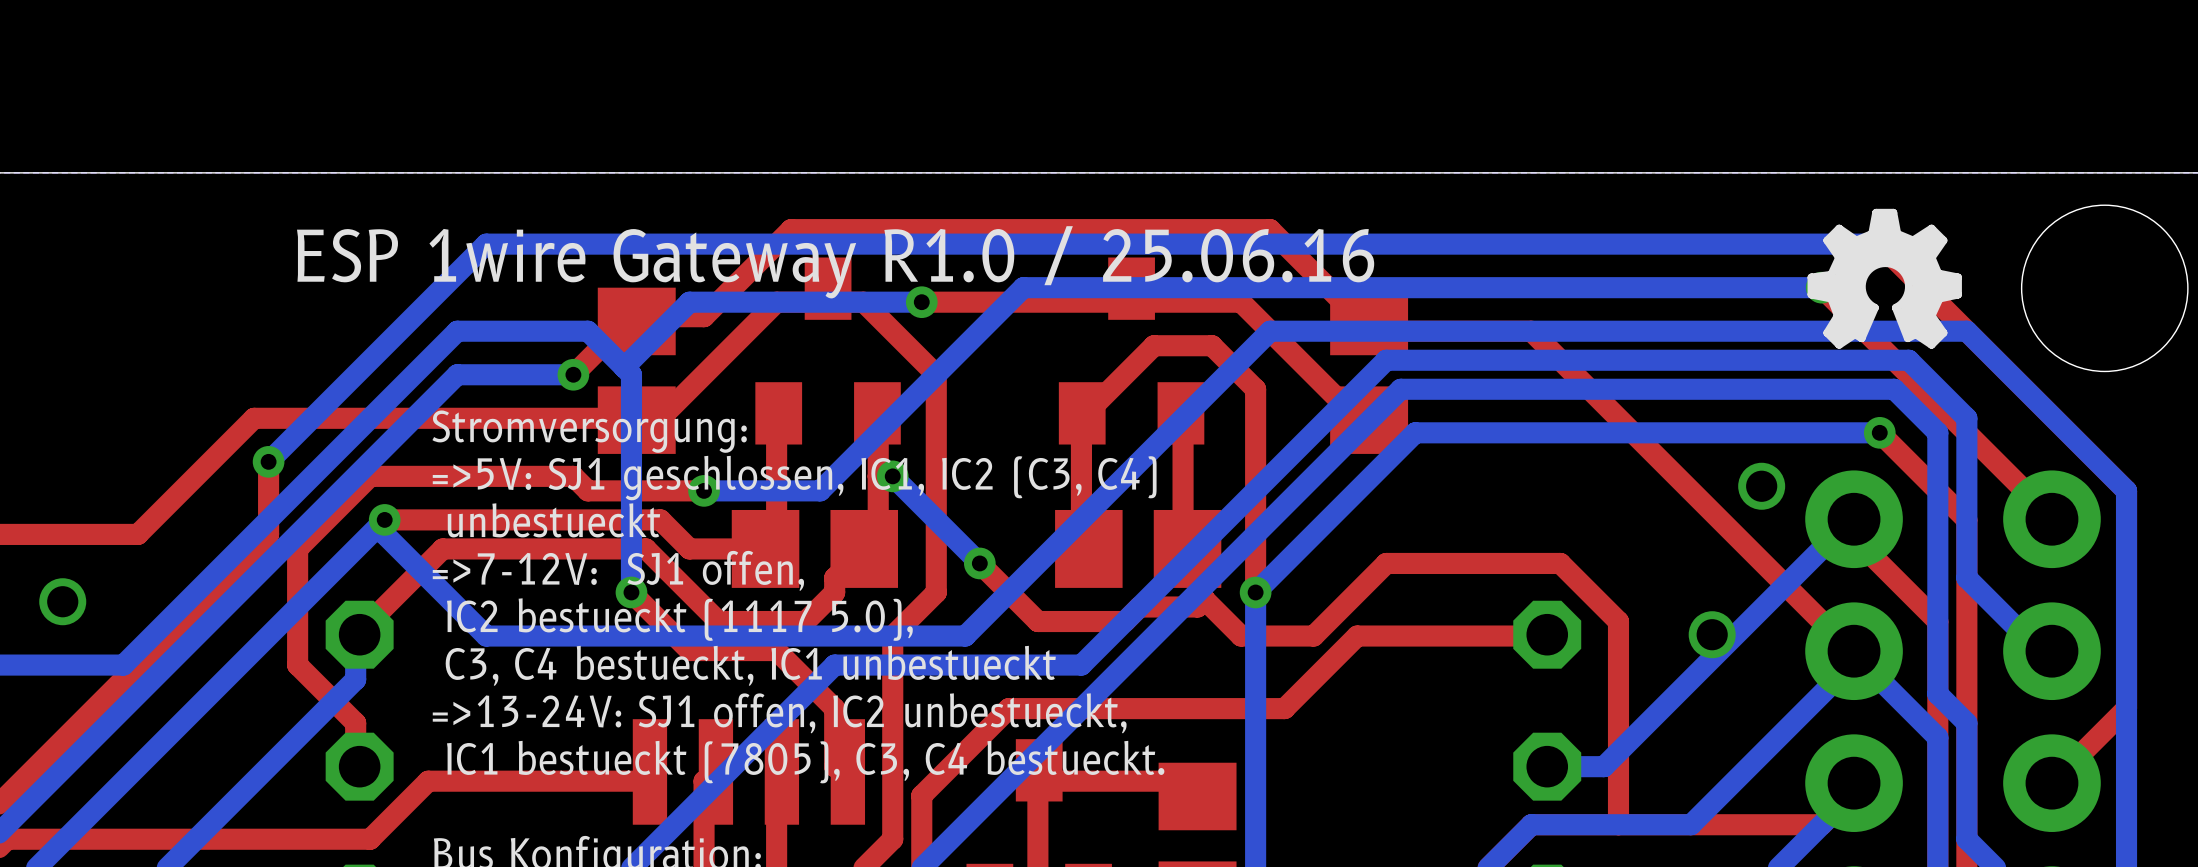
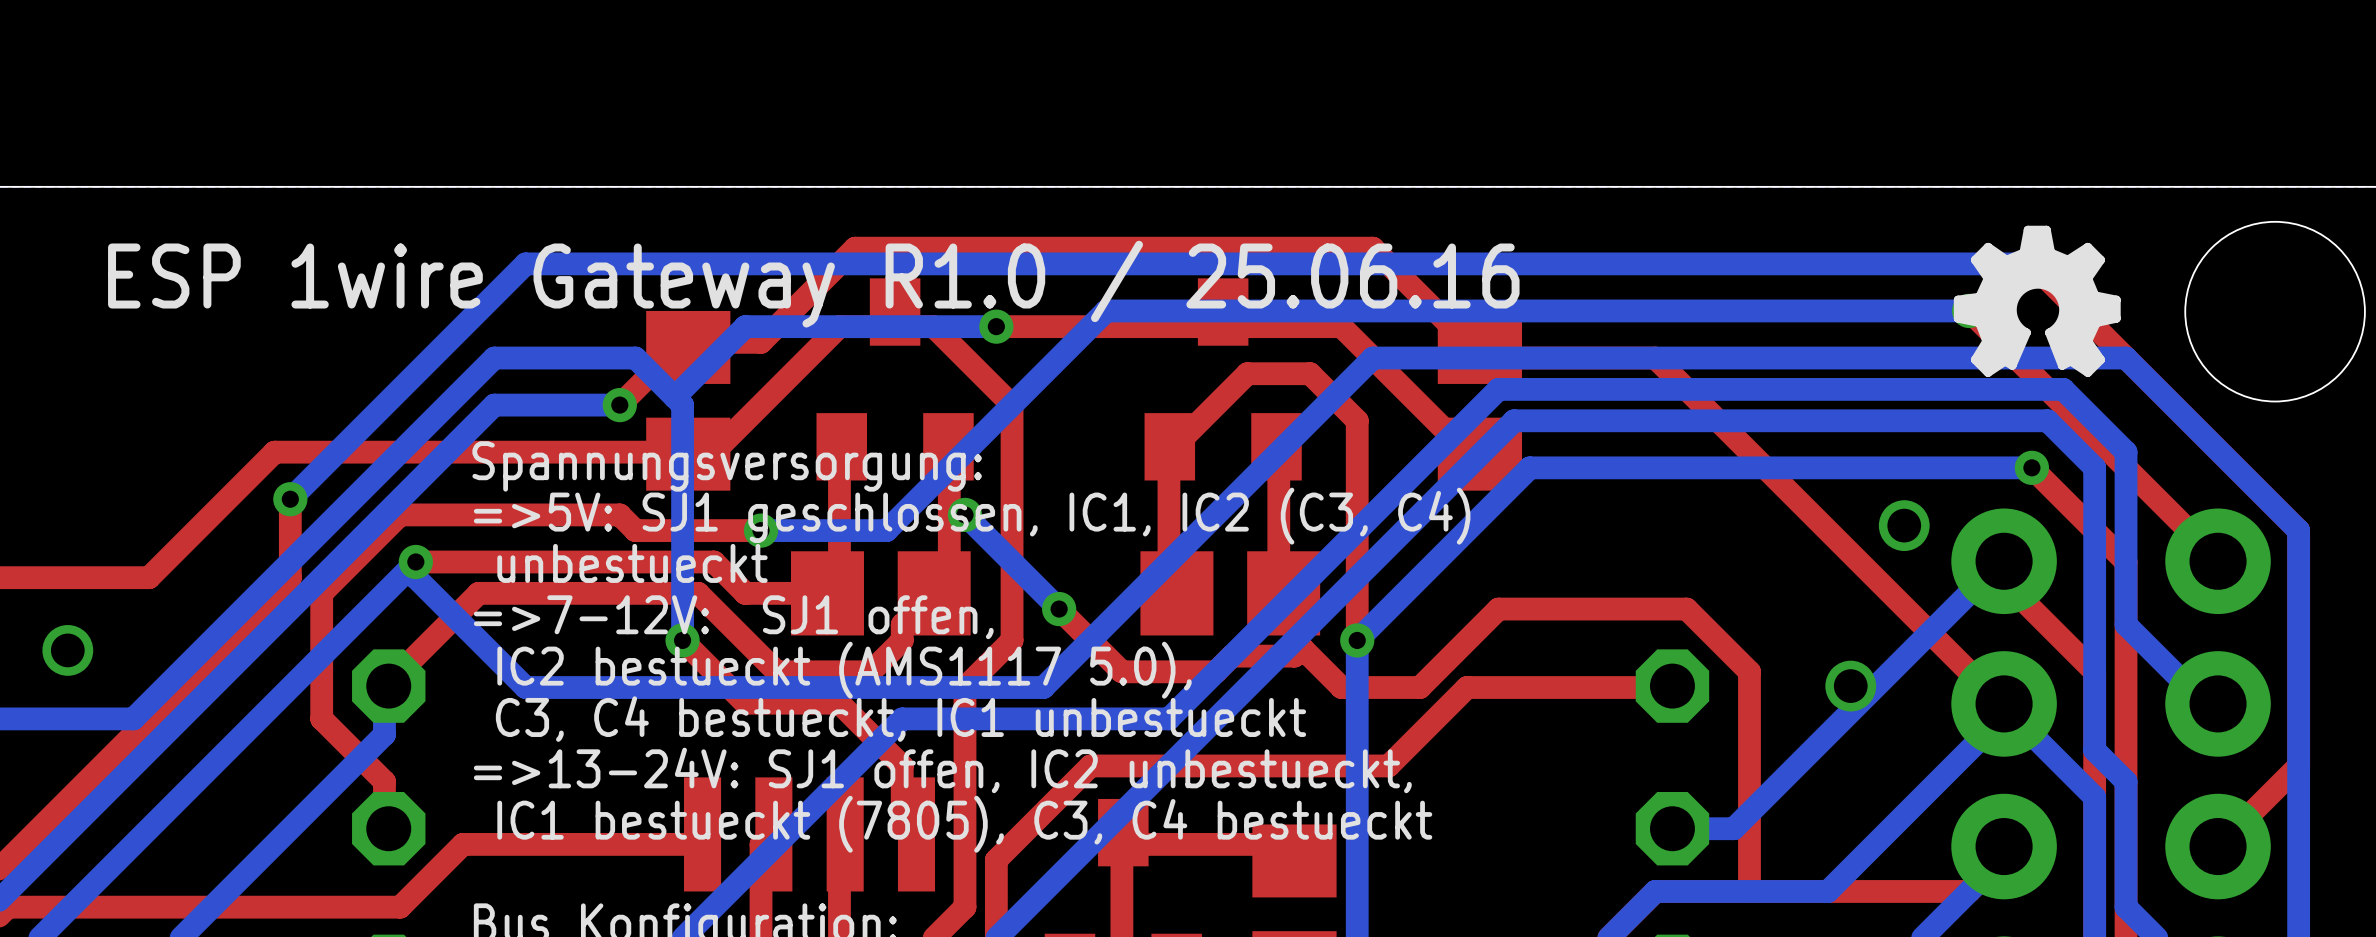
text position: ESP 1wire Gateway R1.0 / 25.06.16 (835, 262) -> ESP 1wire Gateway R1.0 / 25.06.16 (813, 284)
text: Stromversorgung: (589, 431) -> Spannungsversorgung: (727, 466)
text: IC2 bestueckt (1117 5.0), (679, 619) -> IC2 bestueckt (AMS1117 5.0), (844, 670)
text: IC1 bestueckt (7805), C3, C4 bestueckt. (805, 762) -> IC1 bestueckt (7805), C3, C4 bestueckt (964, 824)

